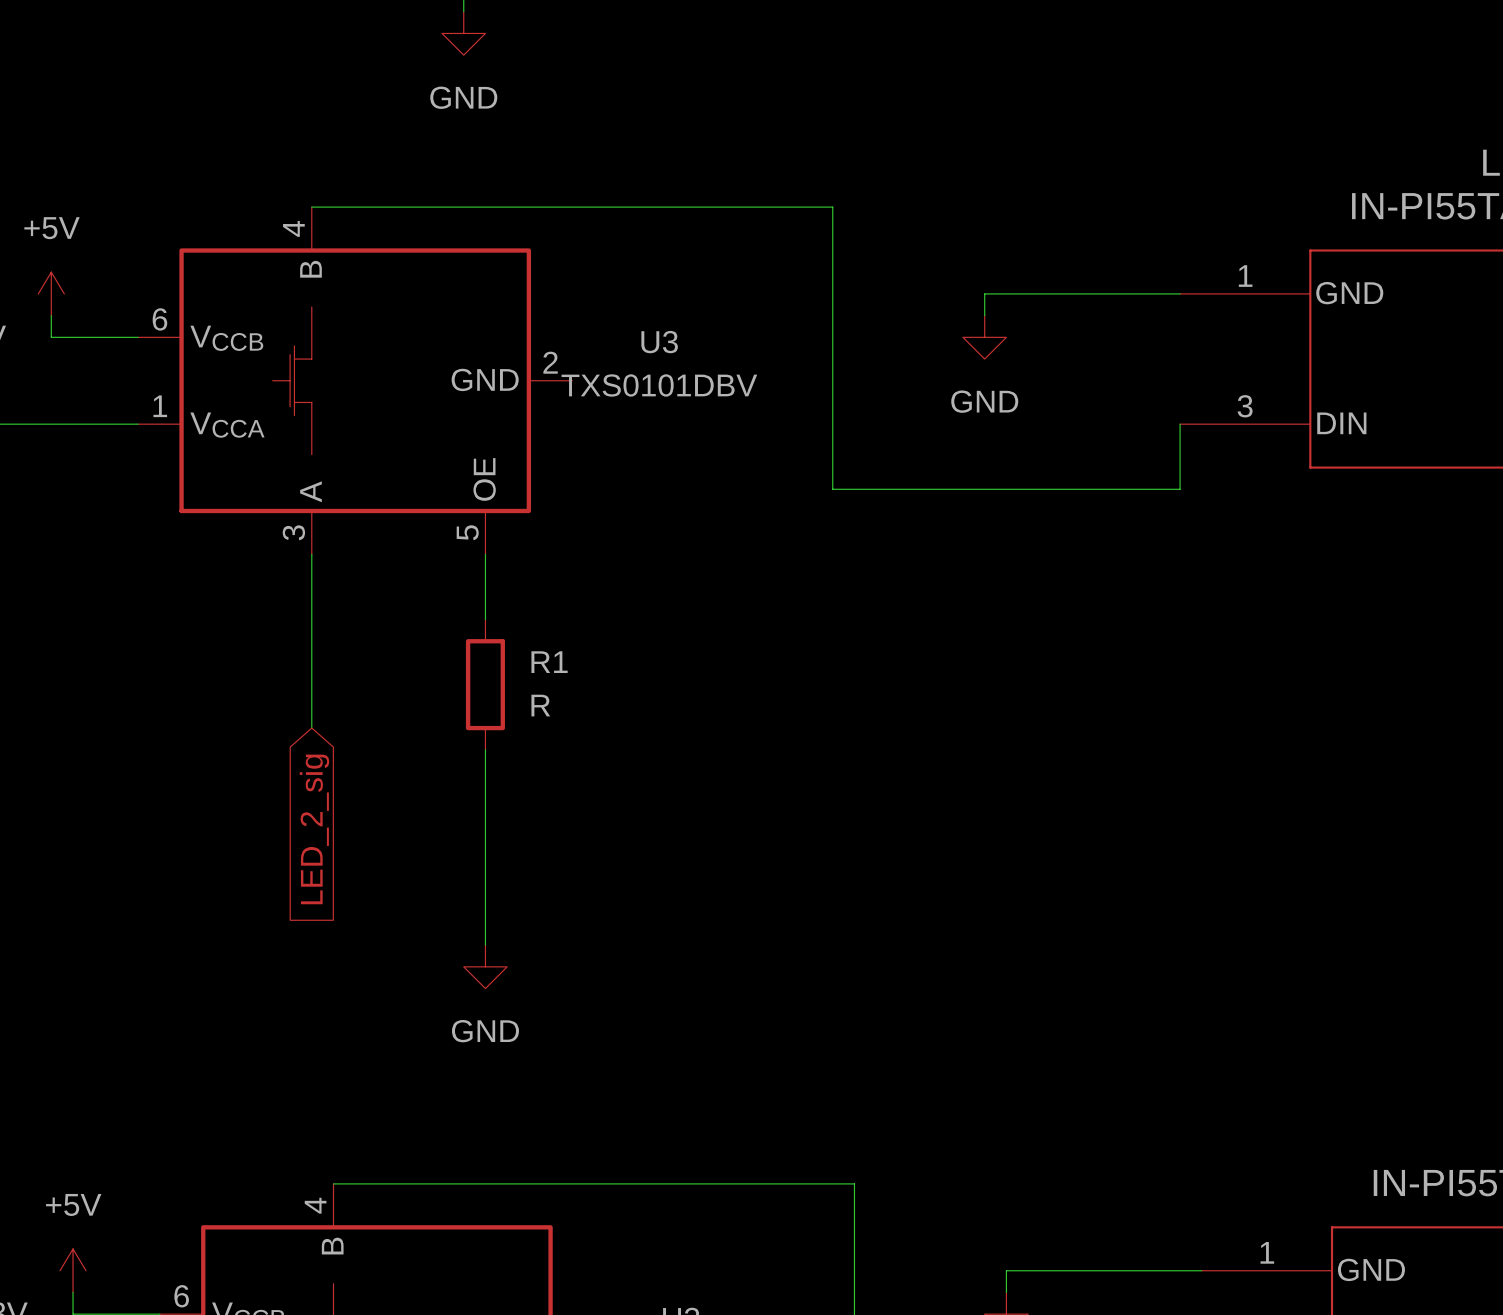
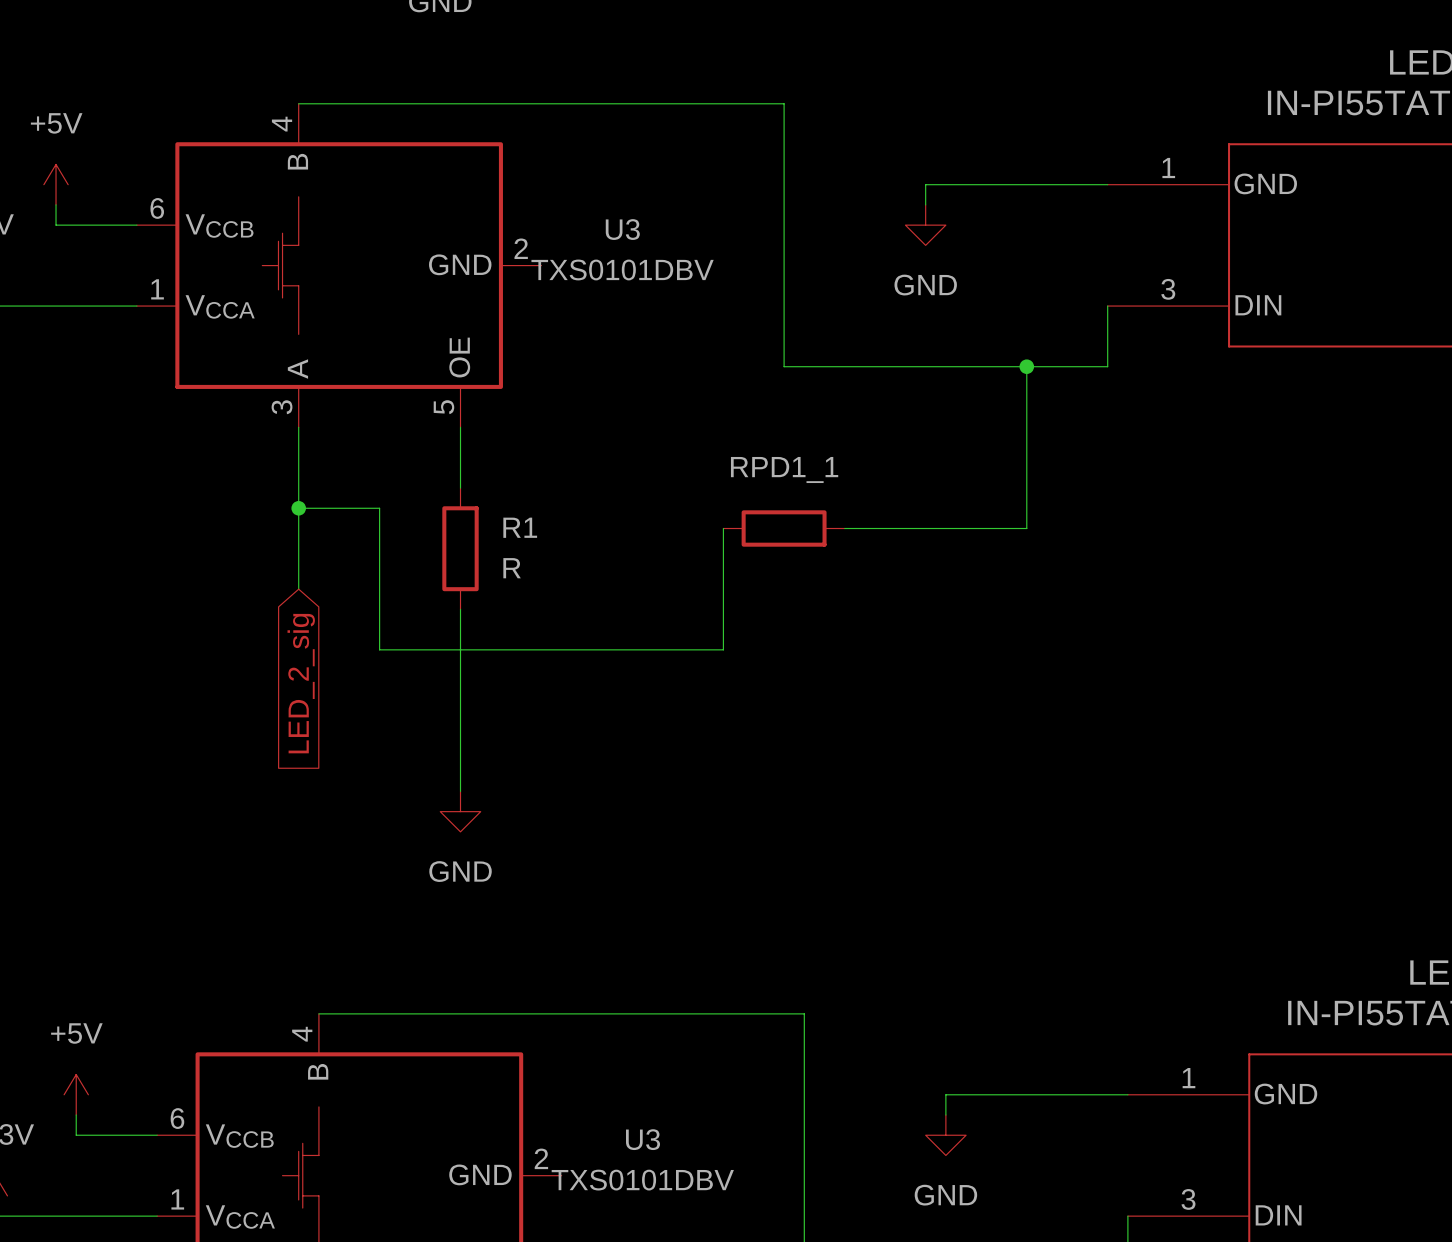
wire: none -> (1026, 366) (1026, 528) (844, 528)
junction: none -> (1026, 366)
wire: none -> (298, 508) (379, 508) (379, 649) (723, 649) (723, 528)
junction: none -> (298, 508)
RPD1_1: none -> (784, 528)

